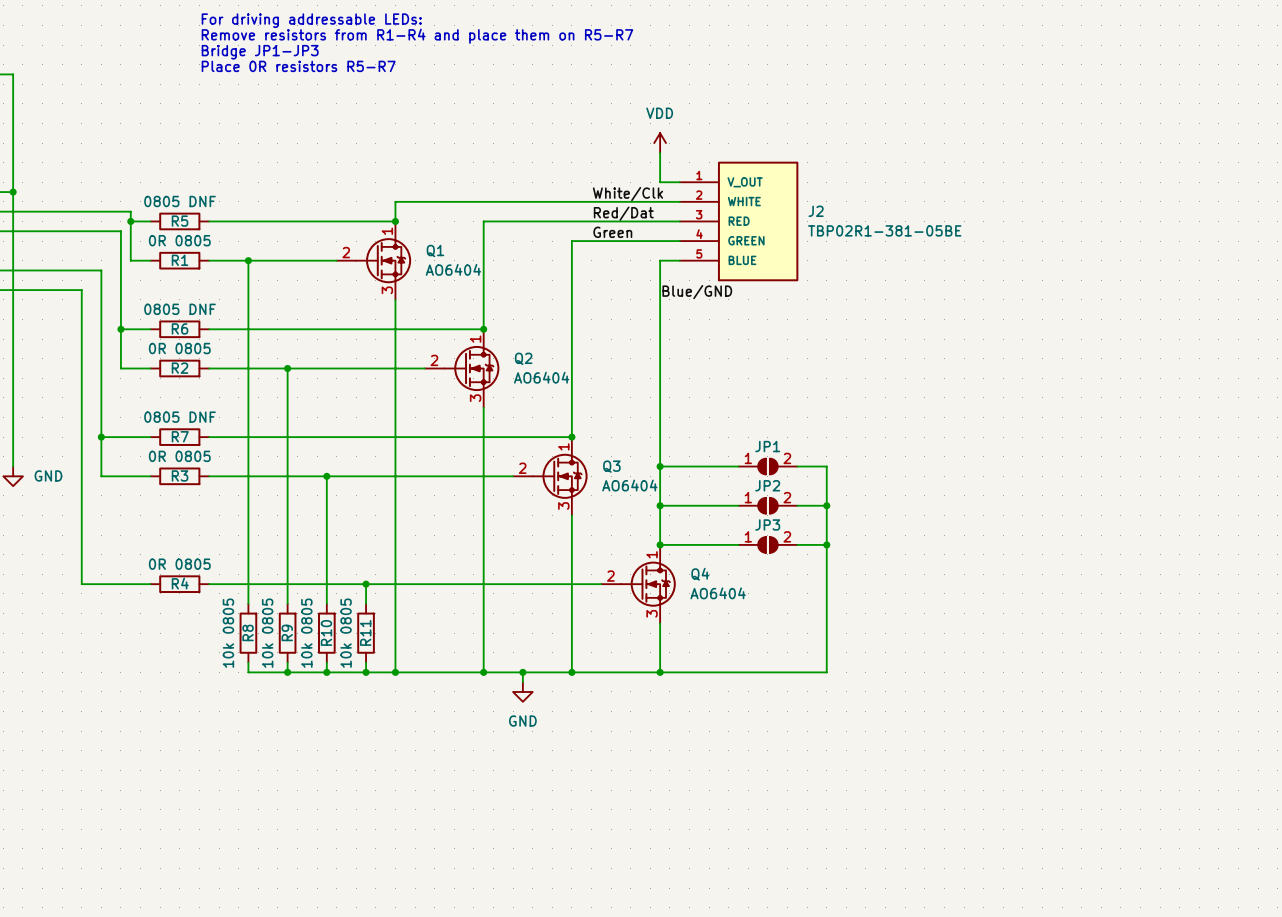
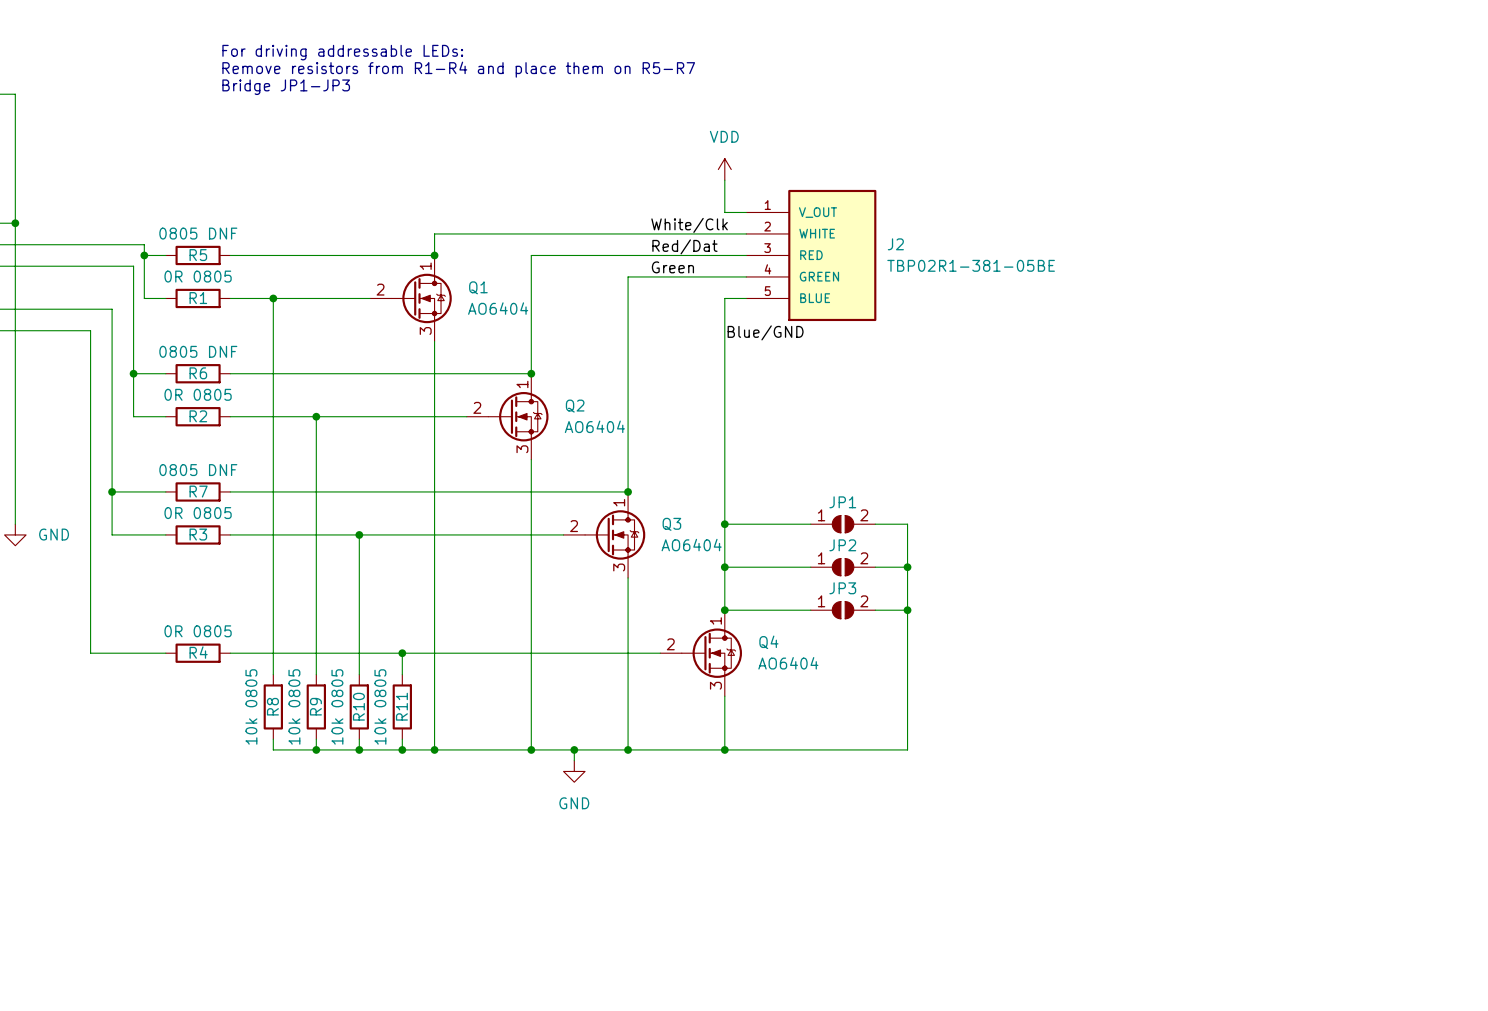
text: For driving addressable LEDs: (311, 20) -> none
text: Remove resistors from R1-R4 and place them on R5-R7 (417, 36) -> For driving addressable LEDs: (342, 52)
text: Bridge JP1-JP3 (260, 52) -> Remove resistors from R1-R4 and place them on R5-R7 (458, 69)
text: Place 0R resistors R5-R7 (298, 66) -> Bridge JP1-JP3 (286, 87)

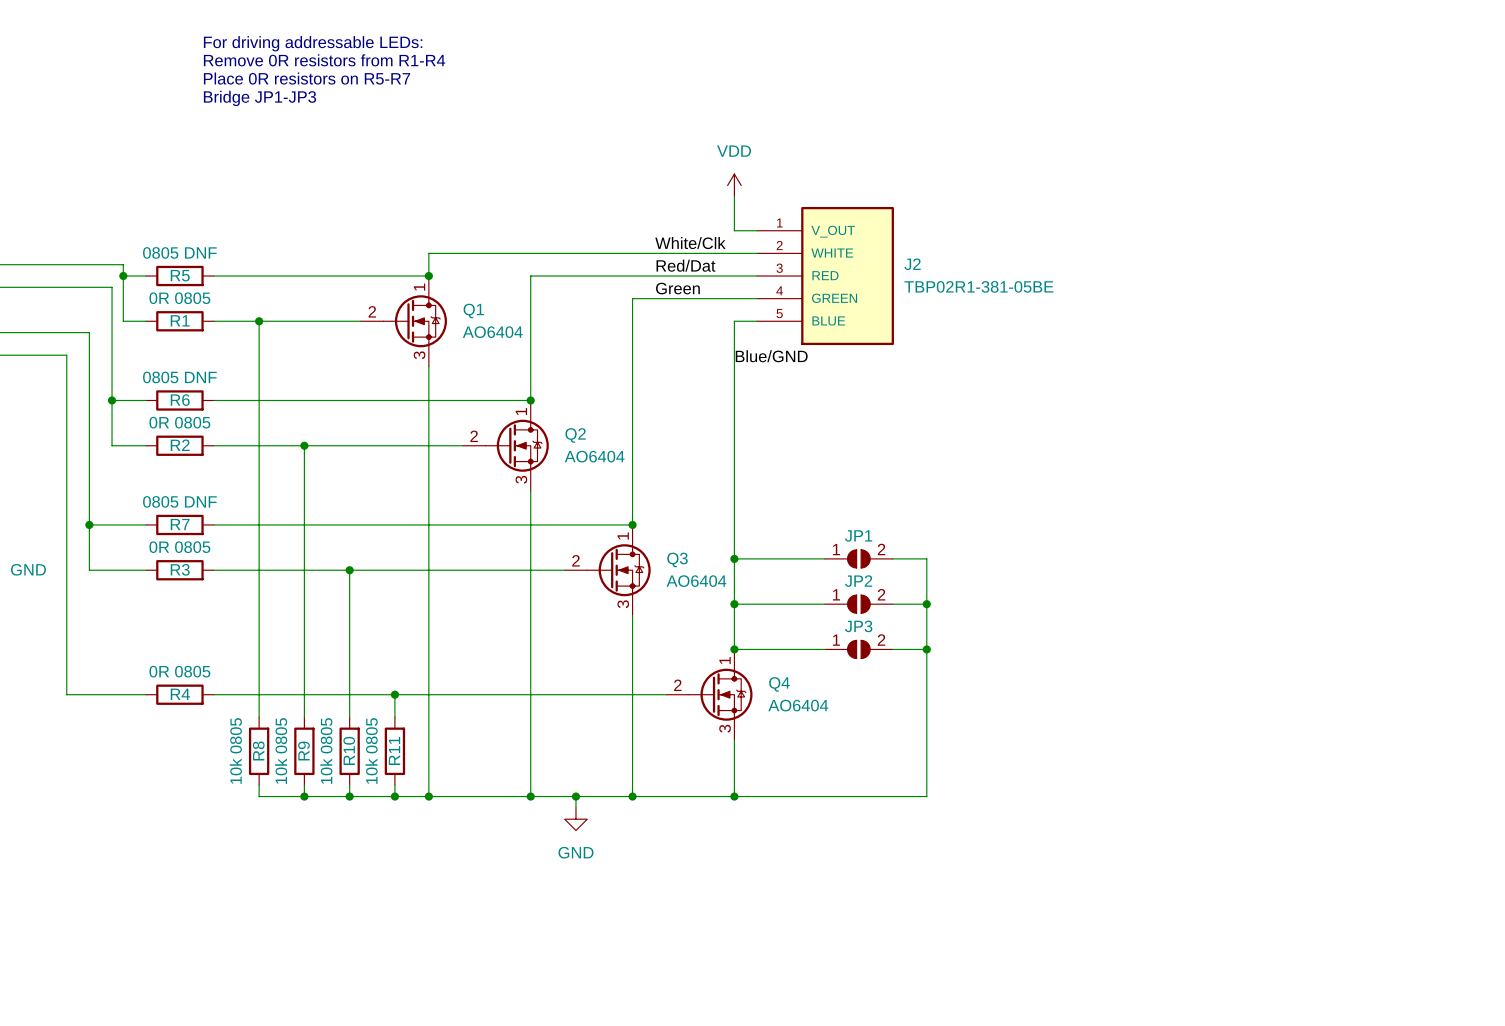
text: none -> For driving addressable LEDs: (313, 43)
text: For driving addressable LEDs: (342, 52) -> Remove 0R resistors from R1-R4 (324, 60)
text: Remove resistors from R1-R4 and place them on R5-R7 (458, 69) -> Place 0R resistors on R5-R7 (307, 78)

